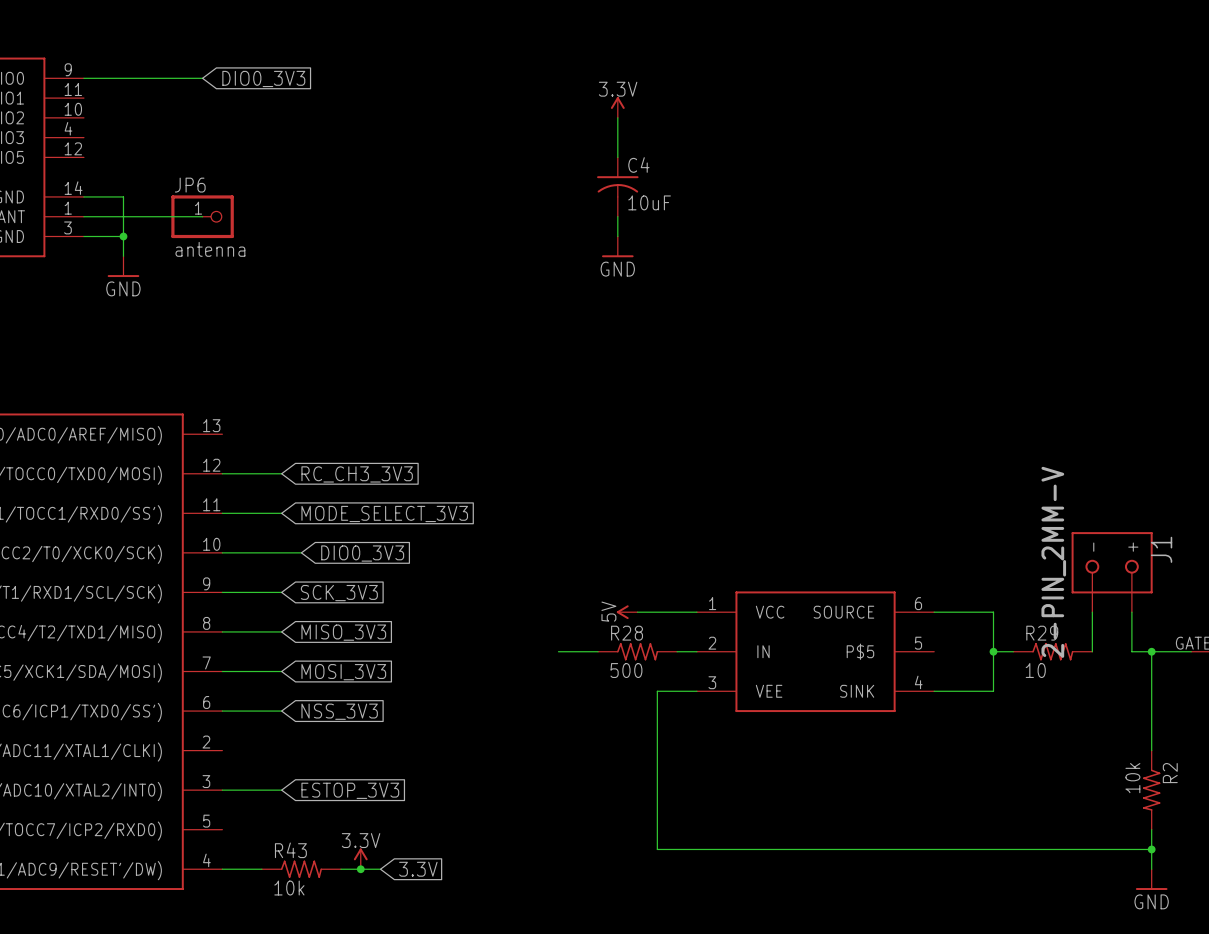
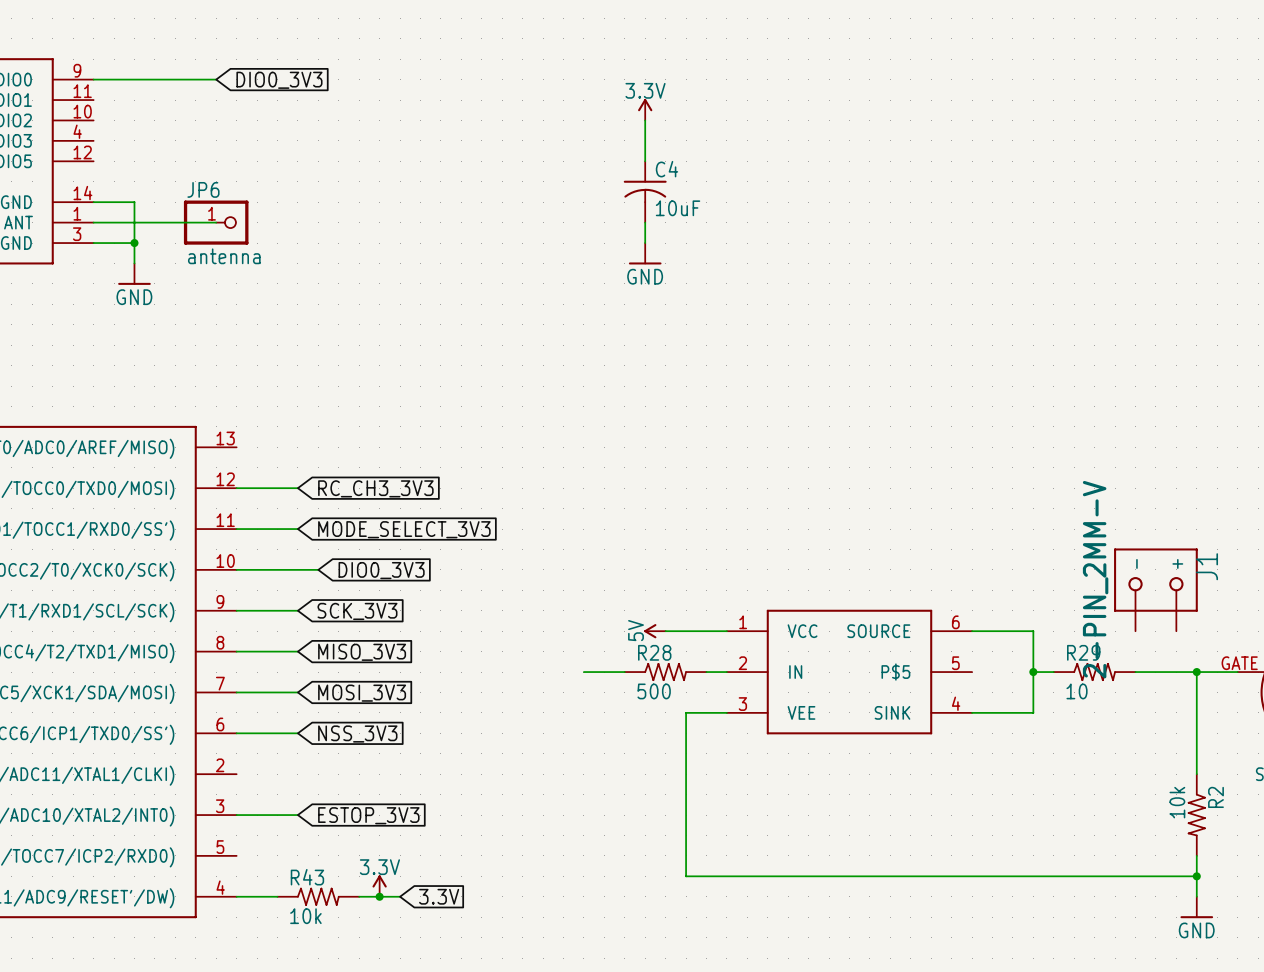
wire: (1092, 612) (1092, 651) -> (1176, 672) (1135, 672)
wire: (1131, 612) (1131, 651) -> none

